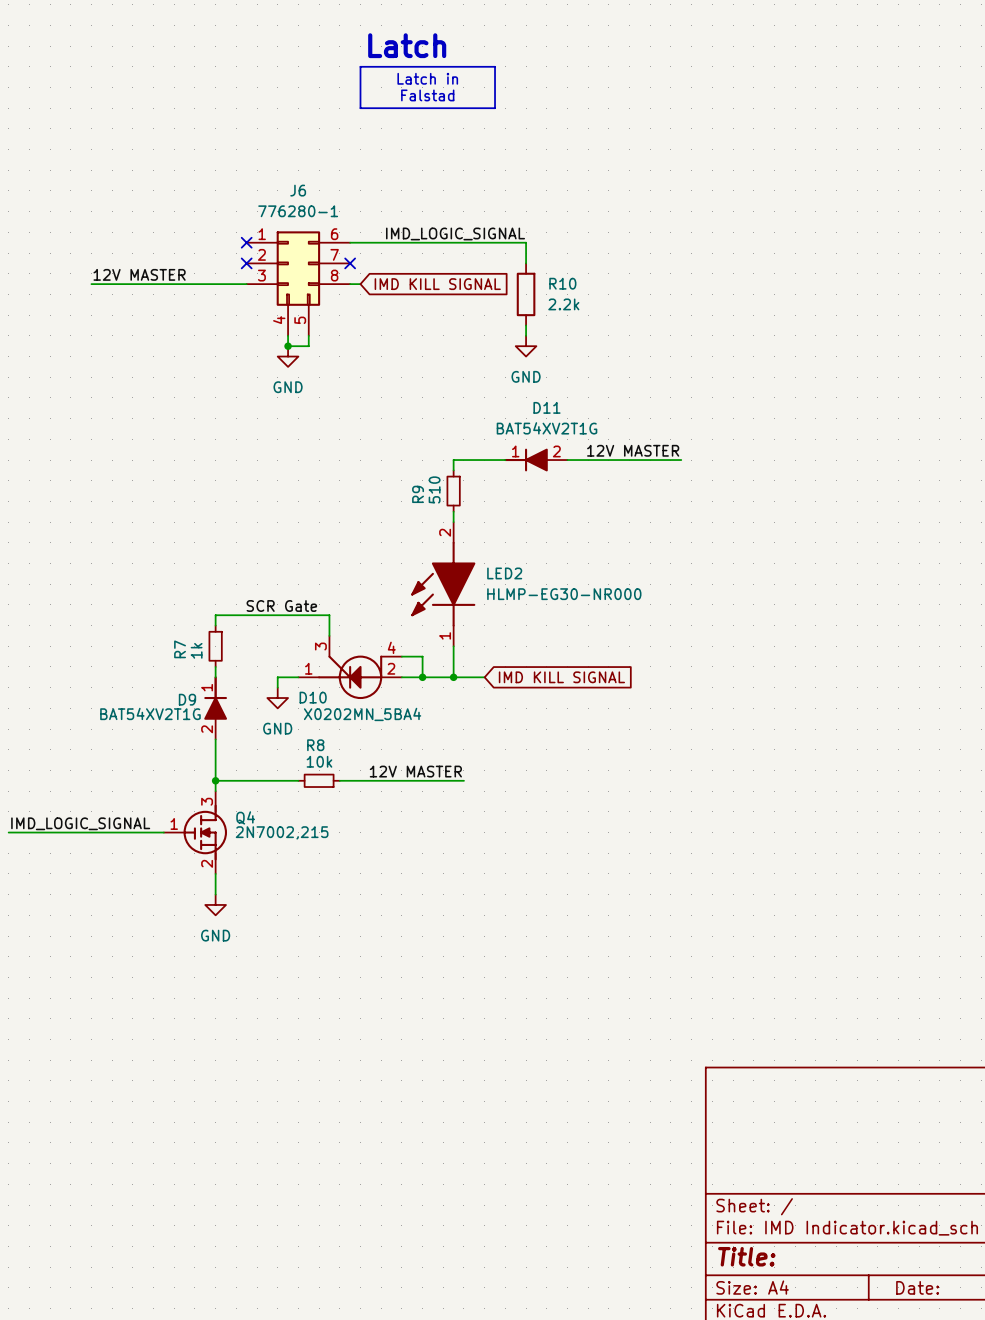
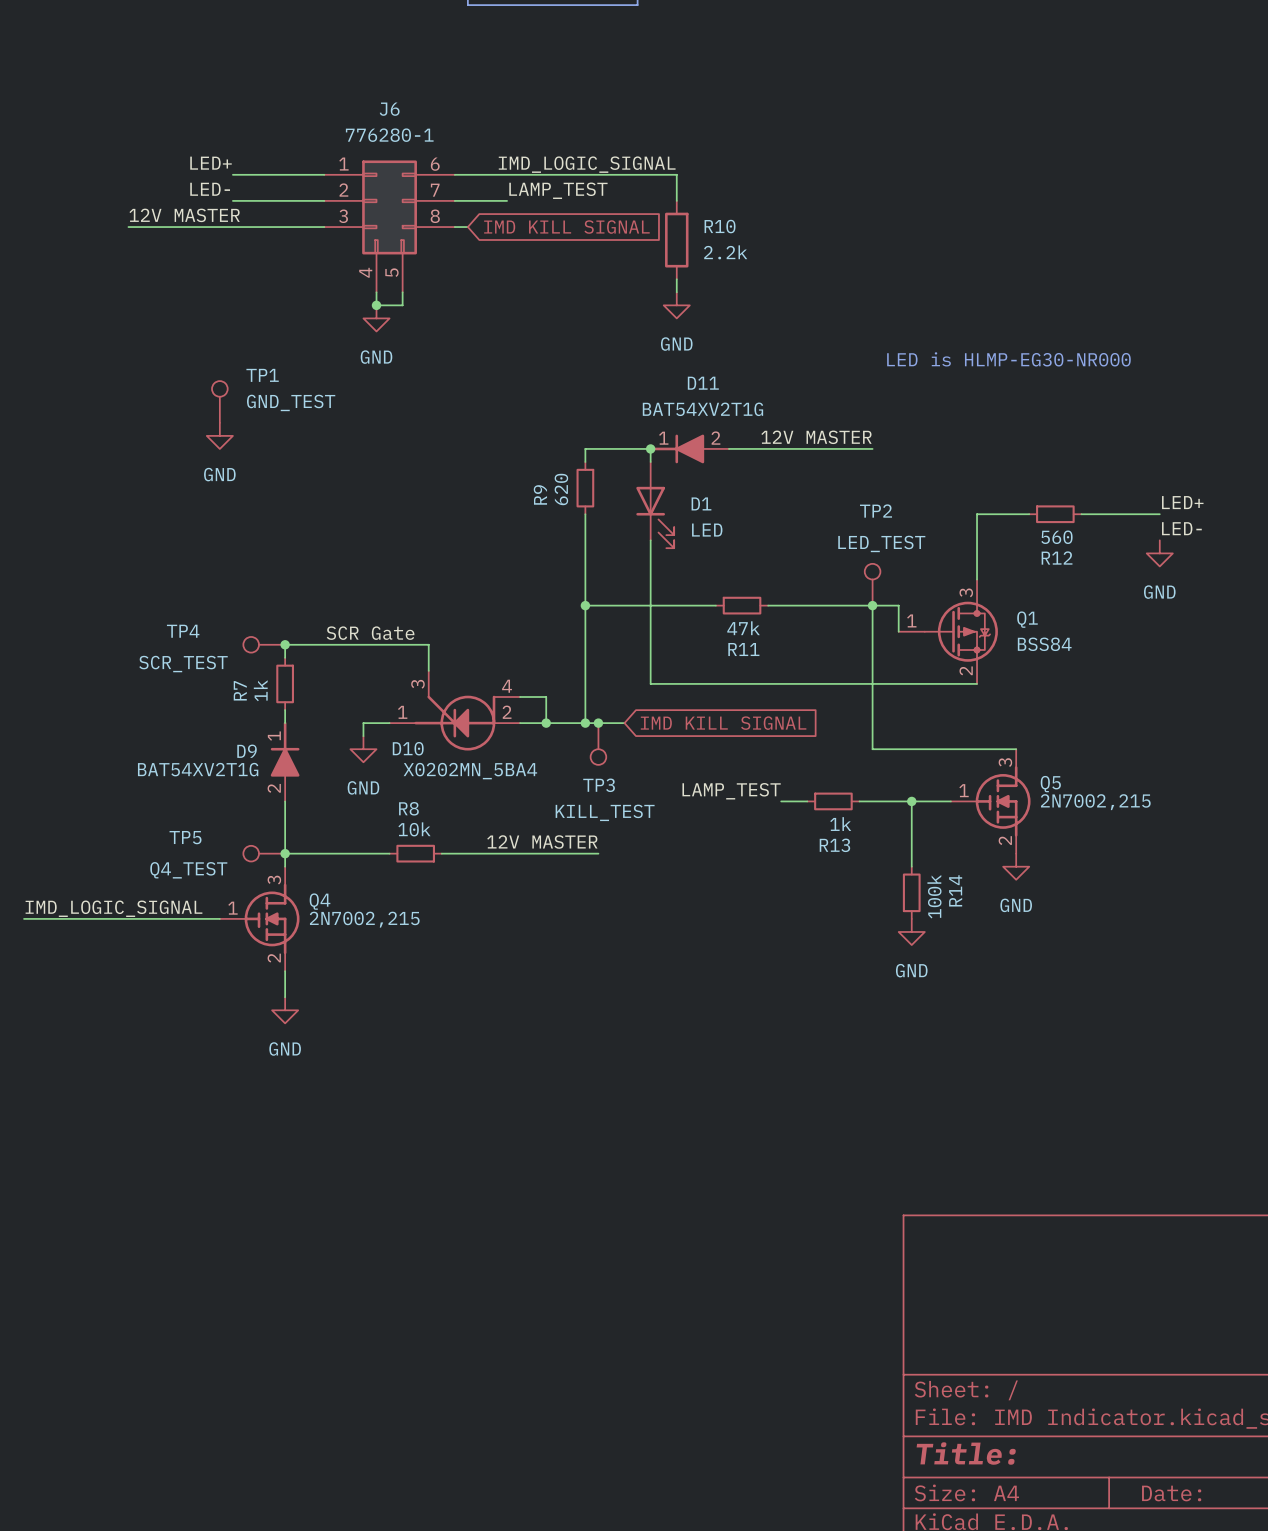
label: none -> LED+ (211, 163)
wire: none -> (232, 174) (324, 174)
no-connect mark: (246, 242) -> none
label: none -> LED- (210, 189)
label: none -> LAMP_TEST (558, 190)
wire: none -> (232, 200) (324, 200)
no-connect mark: (246, 263) -> none
wire: none -> (454, 200) (507, 200)
no-connect mark: (350, 263) -> none
text: none -> LED is HLMP-EG30-NR000 (1008, 359)
TP1: none -> GND_TEST (219, 401)
power symbol: none -> GND (219, 435)
wire: none -> (650, 448) (650, 462)
junction: none -> (650, 448)
R9 value: 510 (434, 489) -> 620 (561, 489)
label: none -> LED+ (1182, 502)
D1: none -> LED (655, 505)
wire: none -> (1029, 514) (977, 514) (977, 579)
R12: none -> 560 (1055, 514)
wire: none -> (1081, 514) (1159, 514)
label: none -> LED- (1181, 528)
wire: none -> (650, 540) (650, 683) (977, 683)
power symbol: none -> GND (1159, 553)
TP2: none -> LED_TEST (872, 584)
LED2: HLMP-EG30-NR000 (443, 584) -> none
wire: none -> (585, 605) (715, 605)
junction: none -> (585, 605)
R11: none -> 47k (742, 605)
wire: none -> (768, 605) (898, 605) (898, 631)
wire: none -> (872, 605) (872, 749) (1016, 749)
junction: none -> (872, 605)
Q1: none -> BSS84 (948, 631)
TP4: none -> SCR_TEST (264, 644)
junction: none -> (285, 644)
junction: none -> (598, 723)
TP3: none -> KILL_TEST (598, 743)
label: none -> LAMP_TEST (731, 791)
wire: none -> (781, 801) (807, 801)
R13: none -> 1k (833, 801)
wire: none -> (859, 801) (950, 801)
wire: none -> (911, 801) (911, 866)
junction: none -> (911, 801)
Q5: none -> 2N7002,215 (990, 801)
TP5: none -> Q4_TEST (264, 853)
power symbol: none -> GND (1016, 866)
R14: none -> 100k (911, 892)
power symbol: none -> GND (911, 931)

